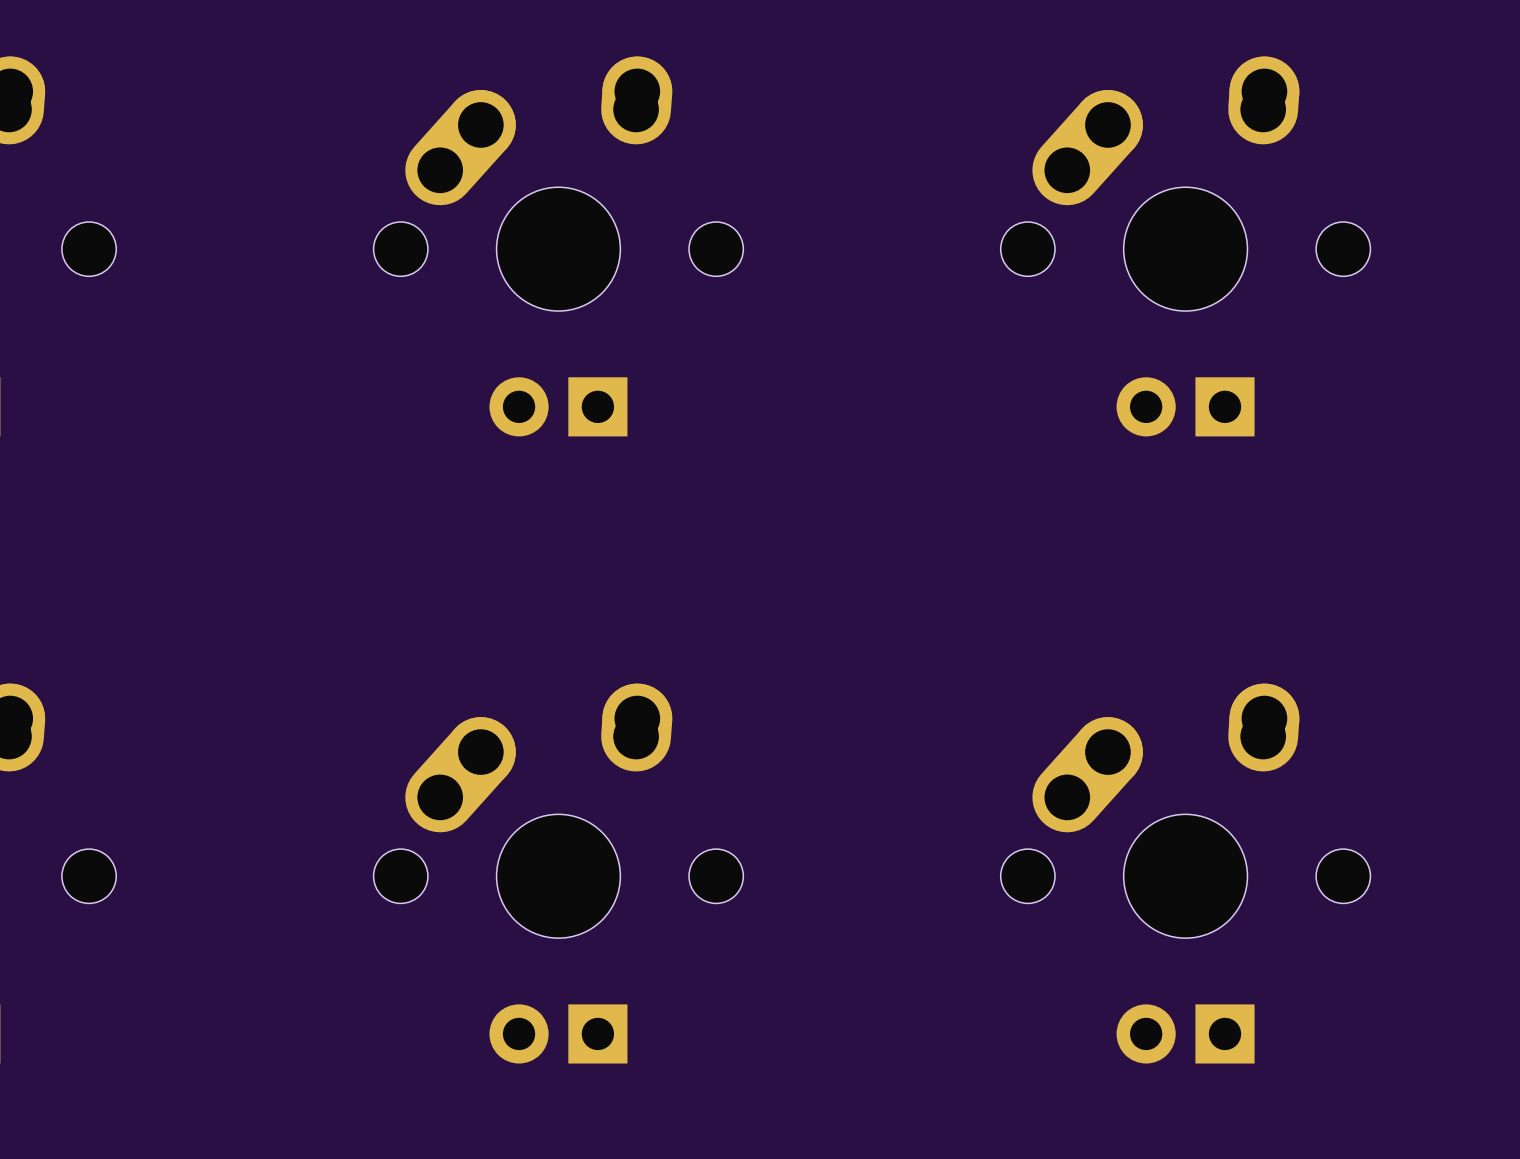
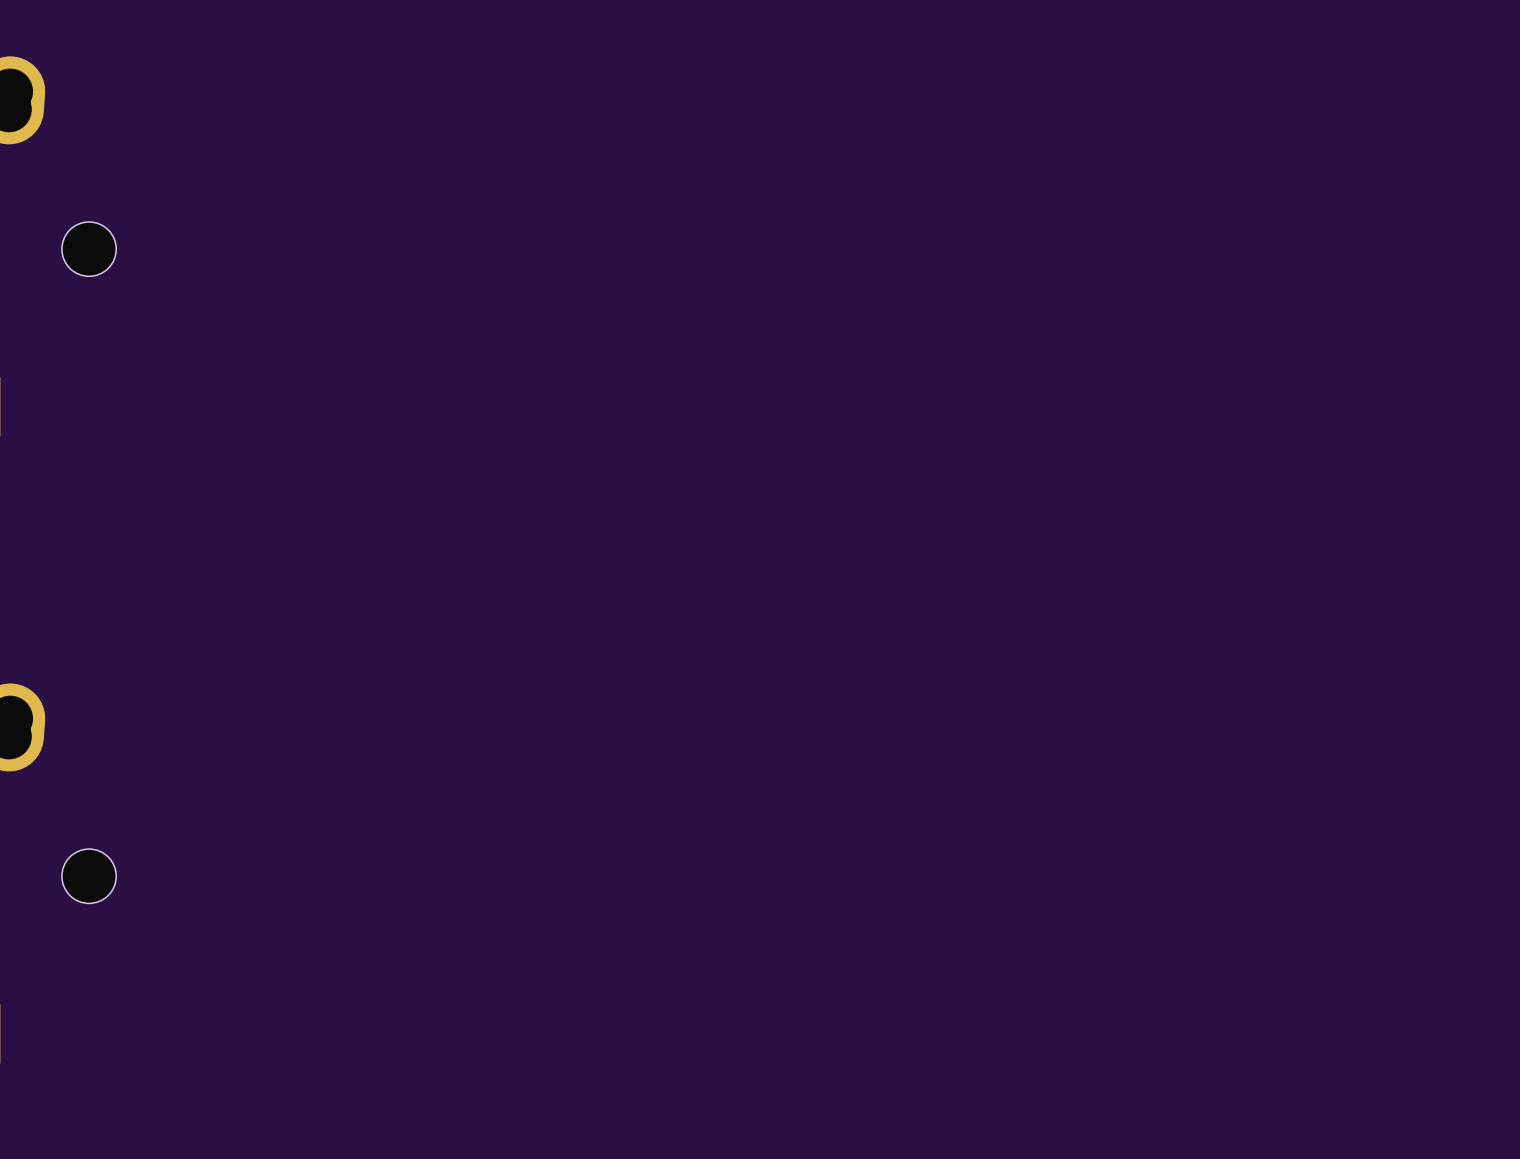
part: (558, 246) -> none
part: (1185, 246) -> none
part: (558, 873) -> none
part: (1185, 873) -> none

